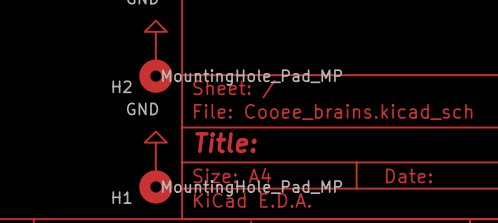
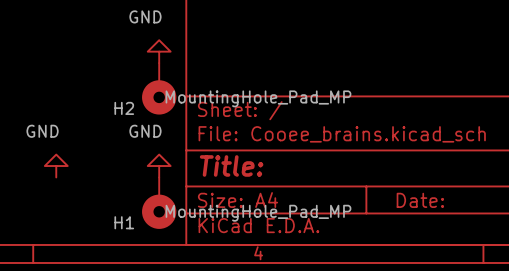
power symbol: none -> GND (56, 166)

